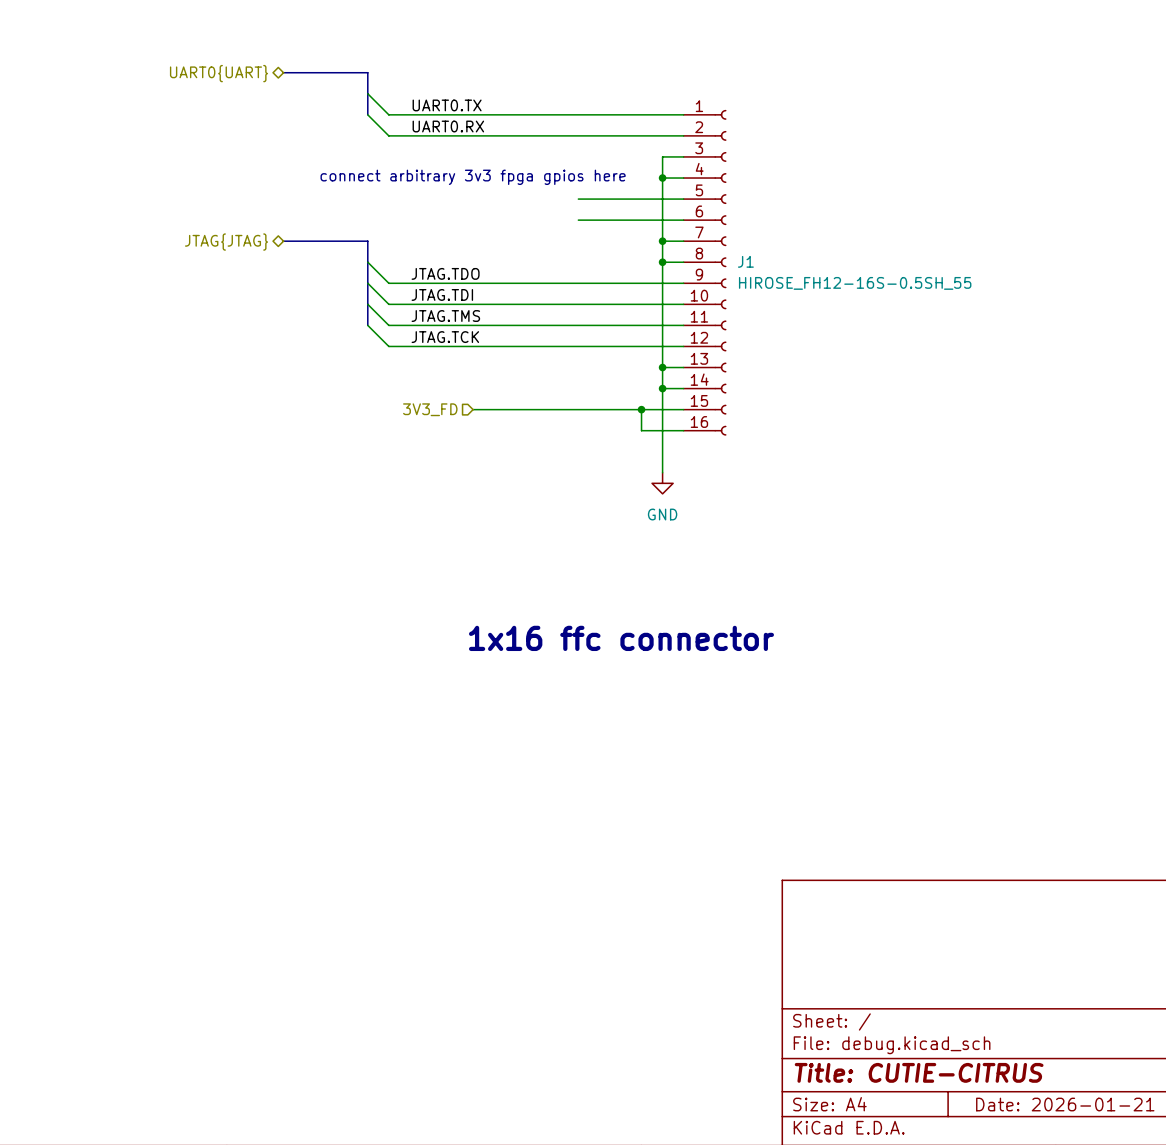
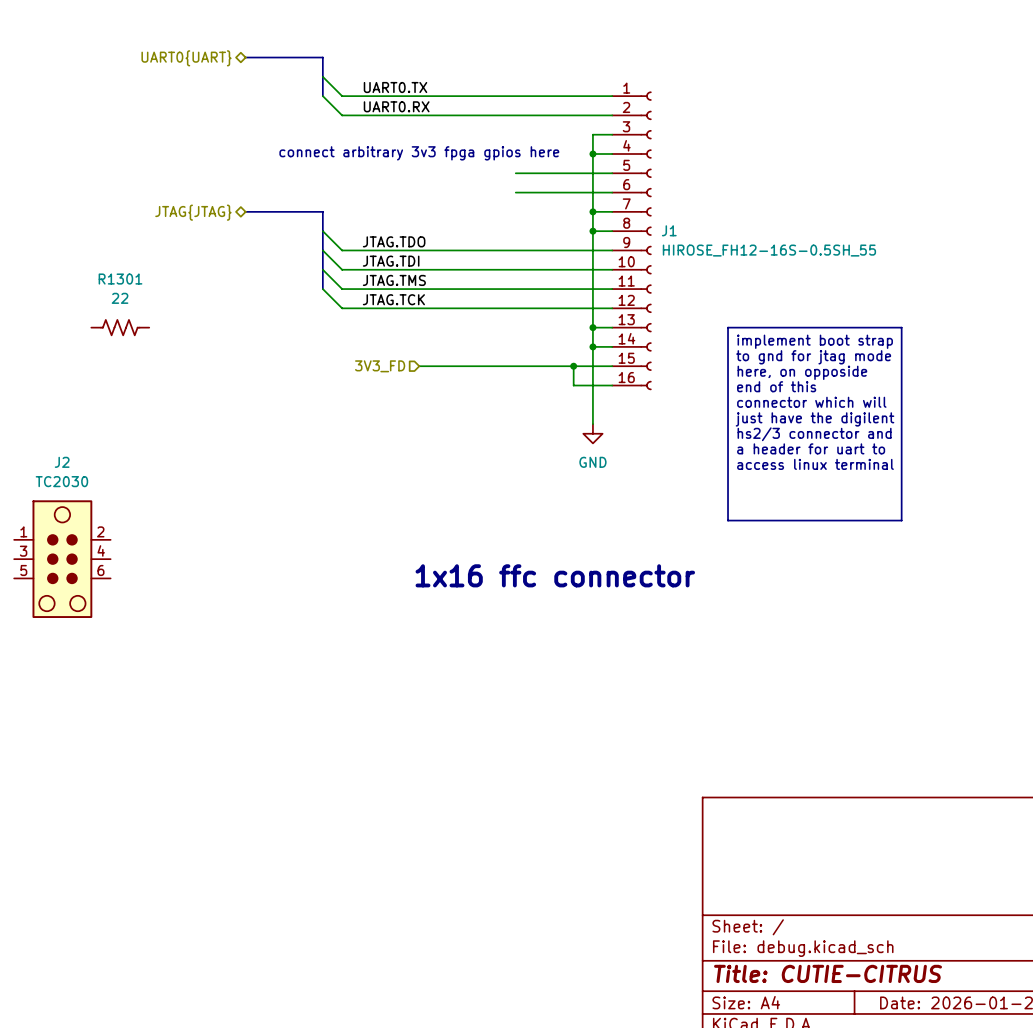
R1301: none -> 22 (120, 327)
line: none -> (728, 327) (901, 327) (901, 520) (728, 520) (728, 327)
text: none -> implement boot strap (815, 341)
text: none -> to gnd for jtag mode (813, 357)
text: none -> here, on opposide (802, 372)
text: none -> end of this (776, 386)
text: none -> connector which will (811, 402)
text: none -> just have the digilent (815, 419)
text: none -> hs2/3 connector and (814, 434)
text: none -> a header for uart to (811, 448)
text: none -> access linux terminal (815, 464)
J2: none -> TC2030 (62, 559)

